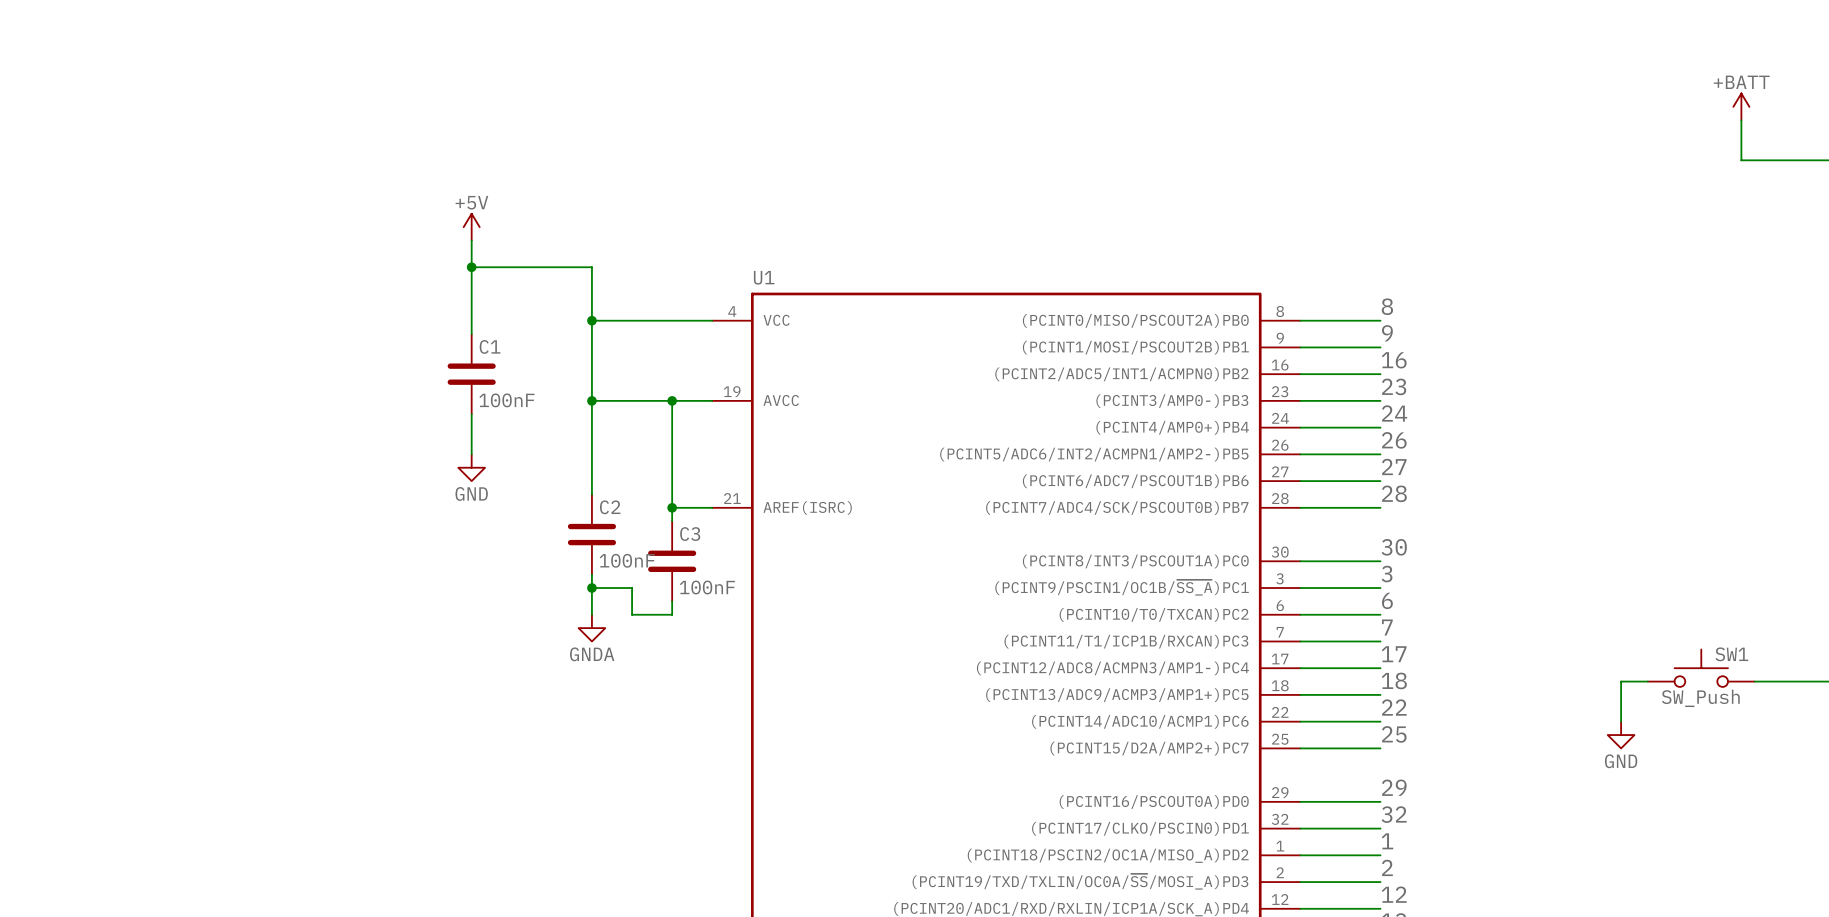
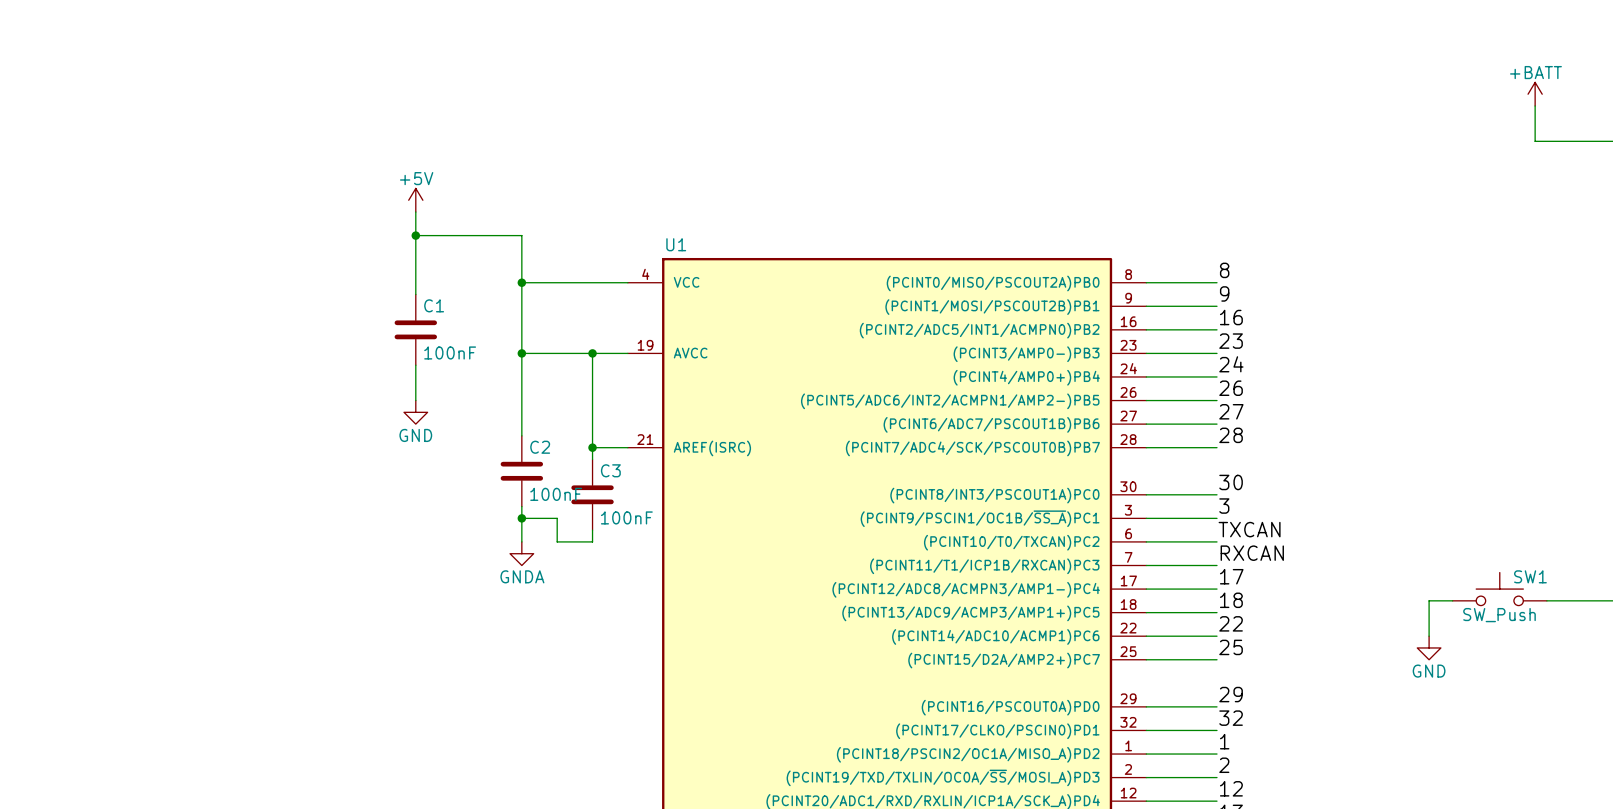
label: 6 (1387, 600) -> TXCAN (1249, 529)
label: 7 (1387, 627) -> RXCAN (1252, 553)

